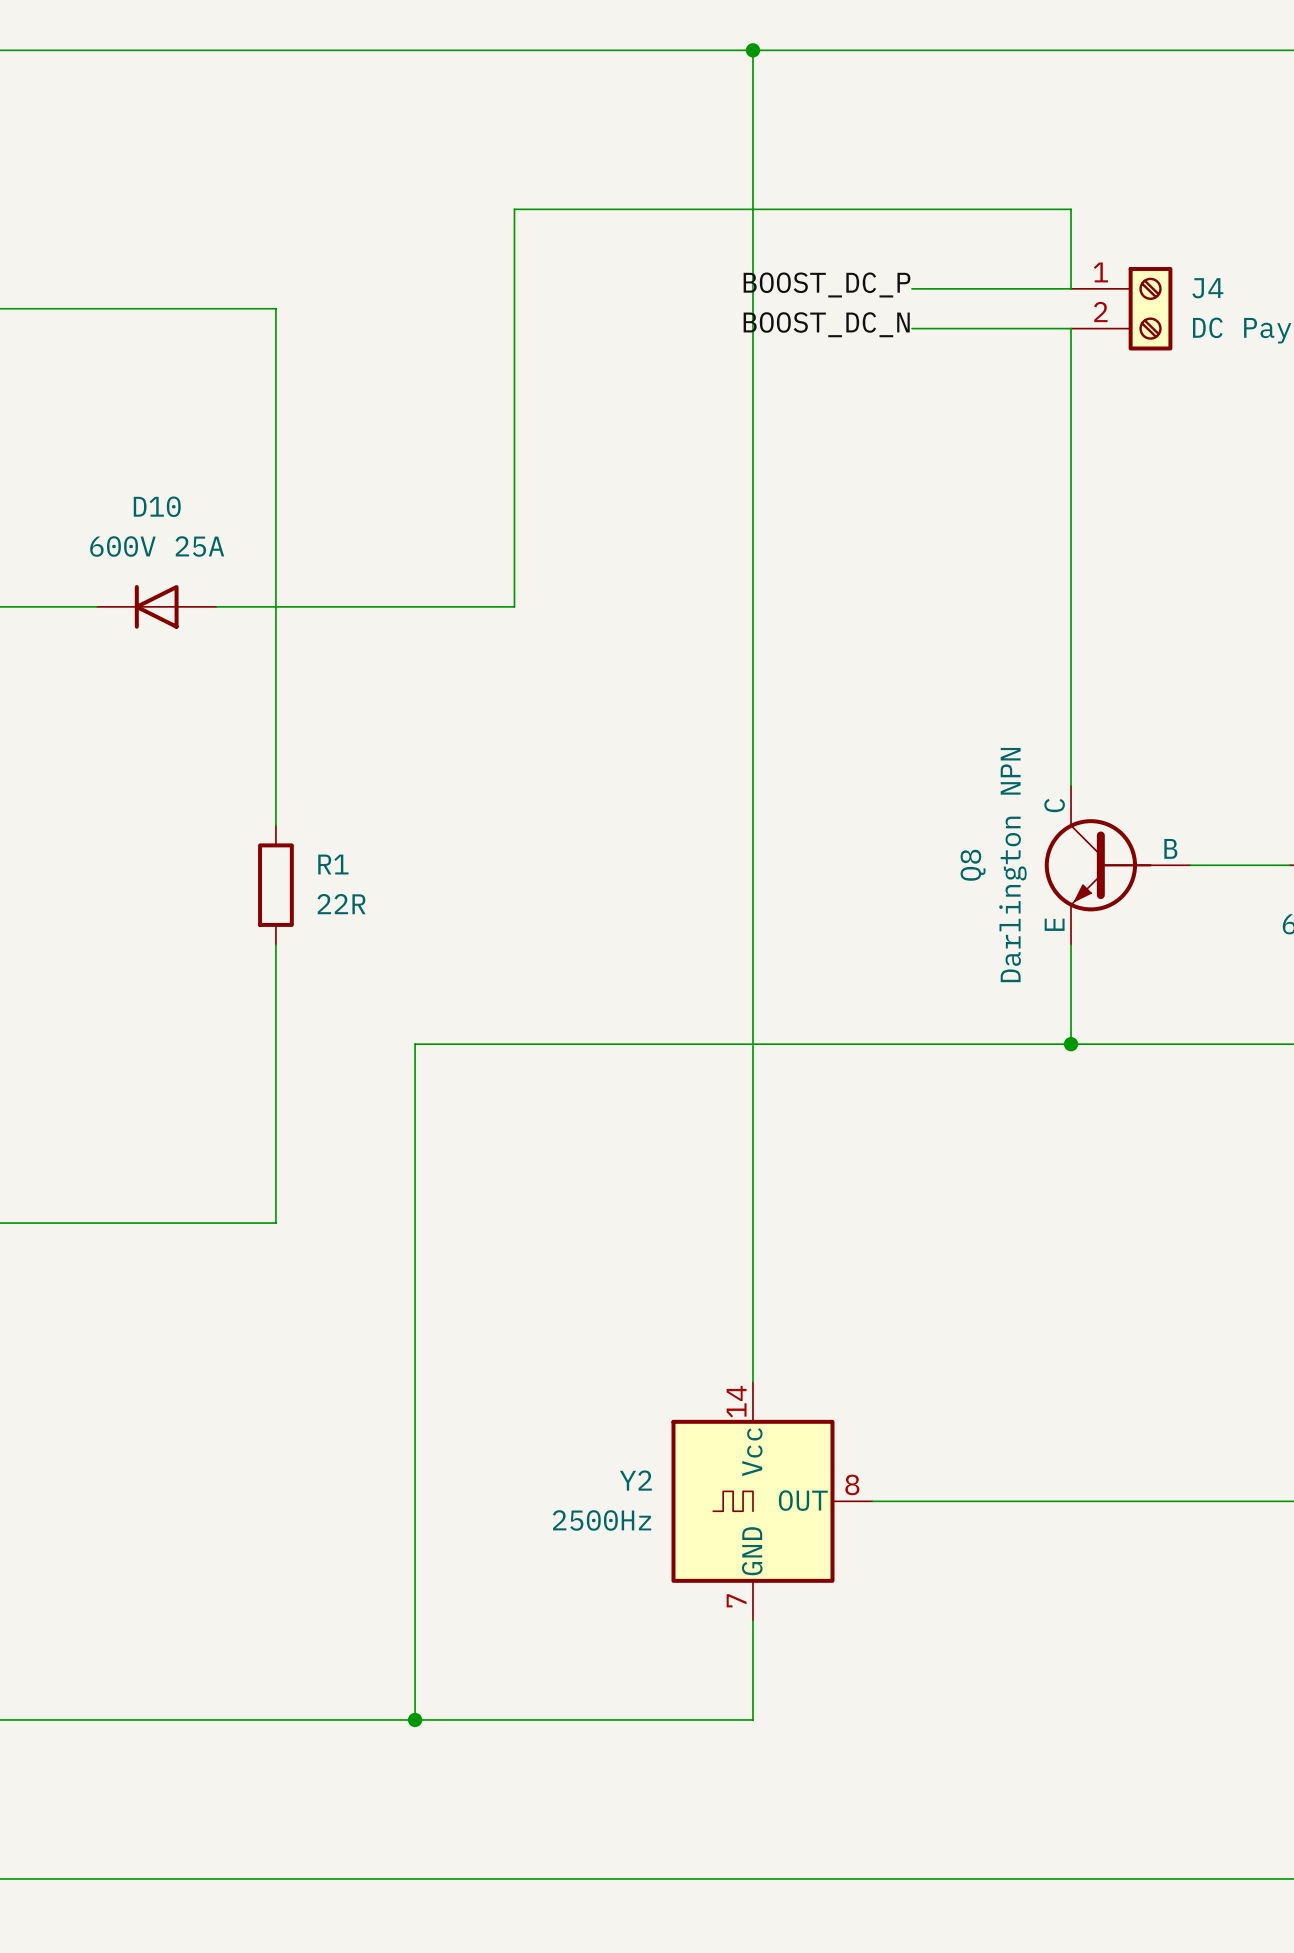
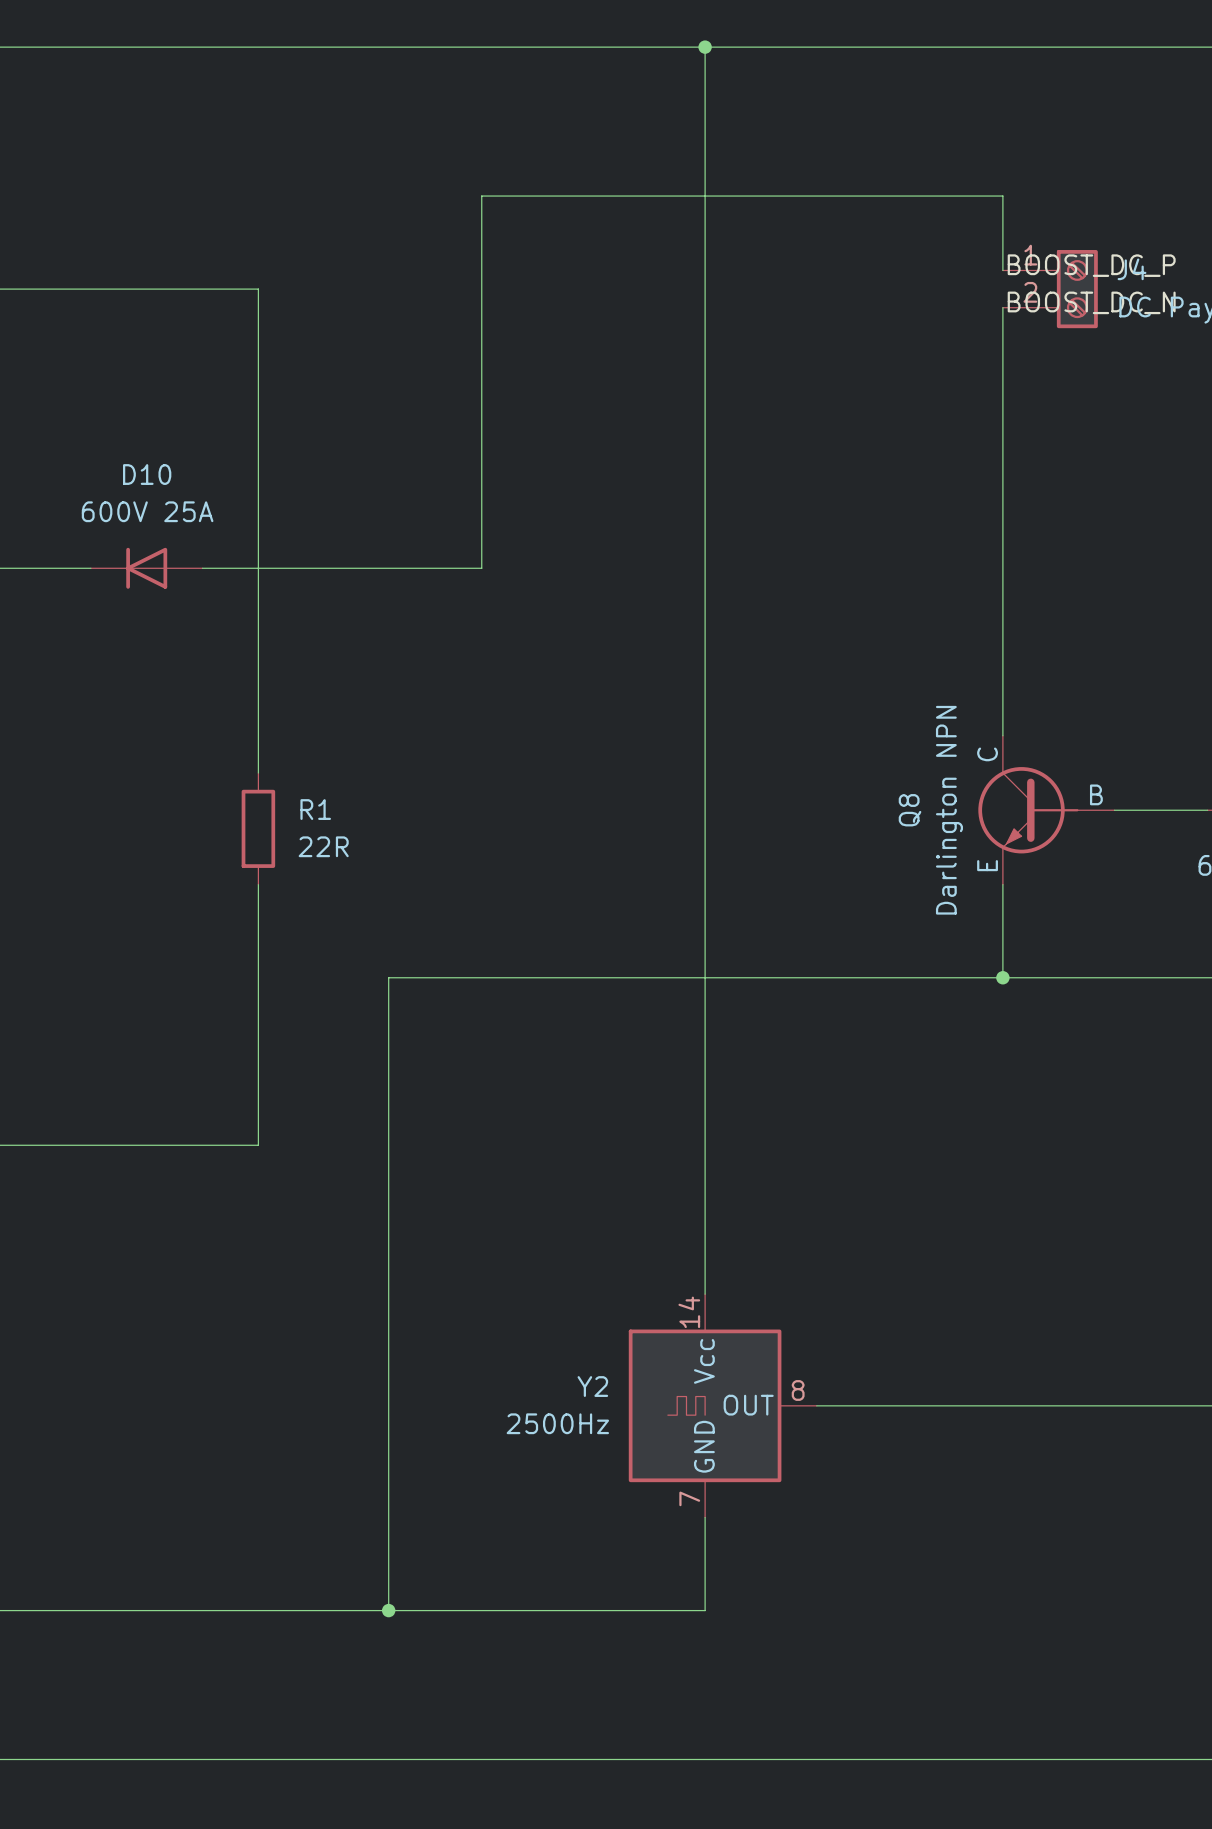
label position: BOOST_DC_P (827, 284) -> BOOST_DC_P (1091, 265)
wire: (912, 288) (1071, 288) -> none
label position: BOOST_DC_N (826, 324) -> BOOST_DC_N (1091, 302)
wire: (912, 328) (1071, 328) -> none

